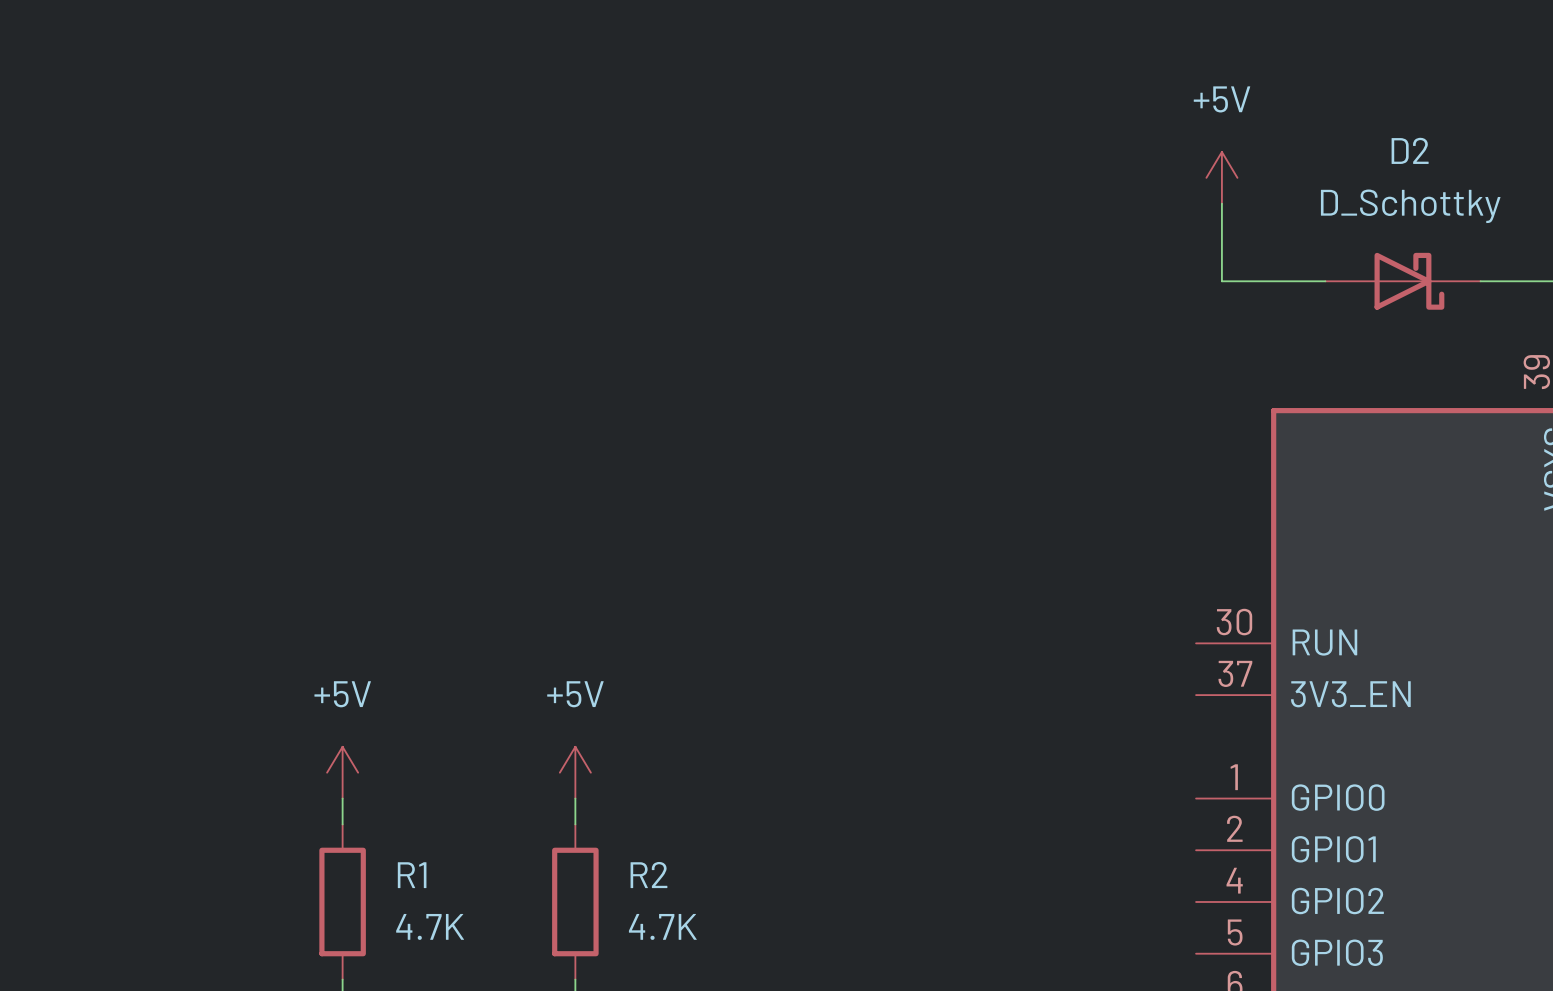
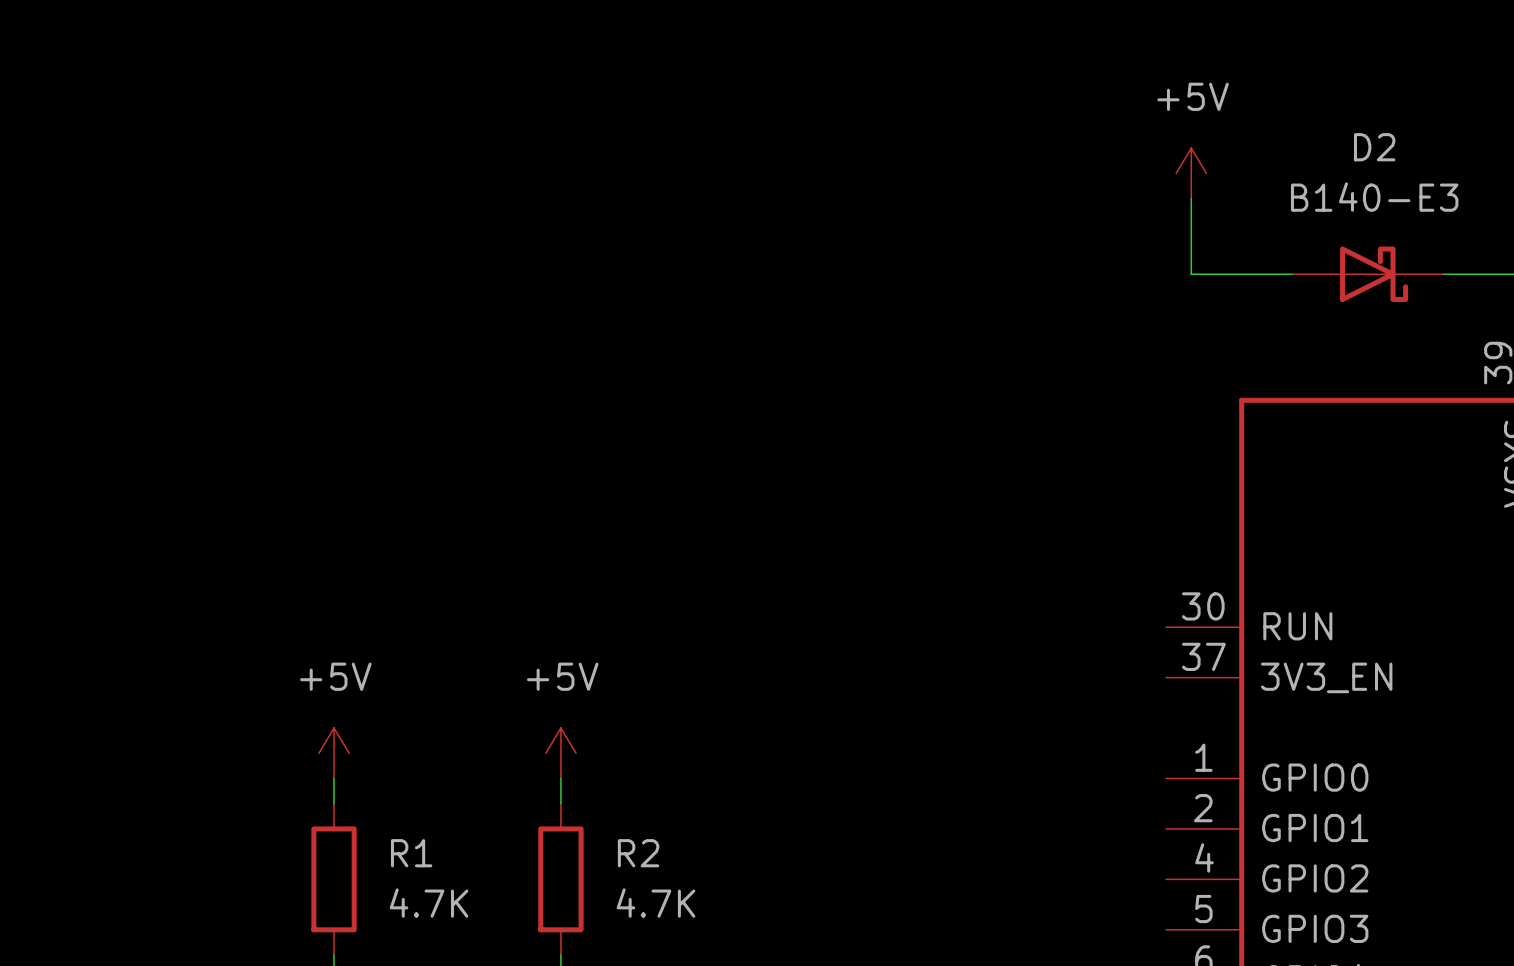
D2 value: D_Schottky (1410, 206) -> B140-E3 (1374, 197)

